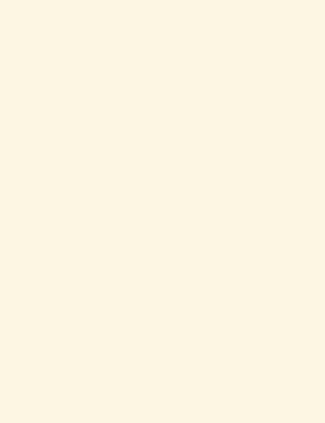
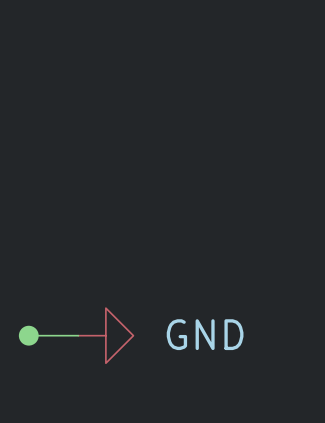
wire: none -> (23, 335) (78, 335)
junction: none -> (28, 335)
power symbol: none -> GND (105, 335)

